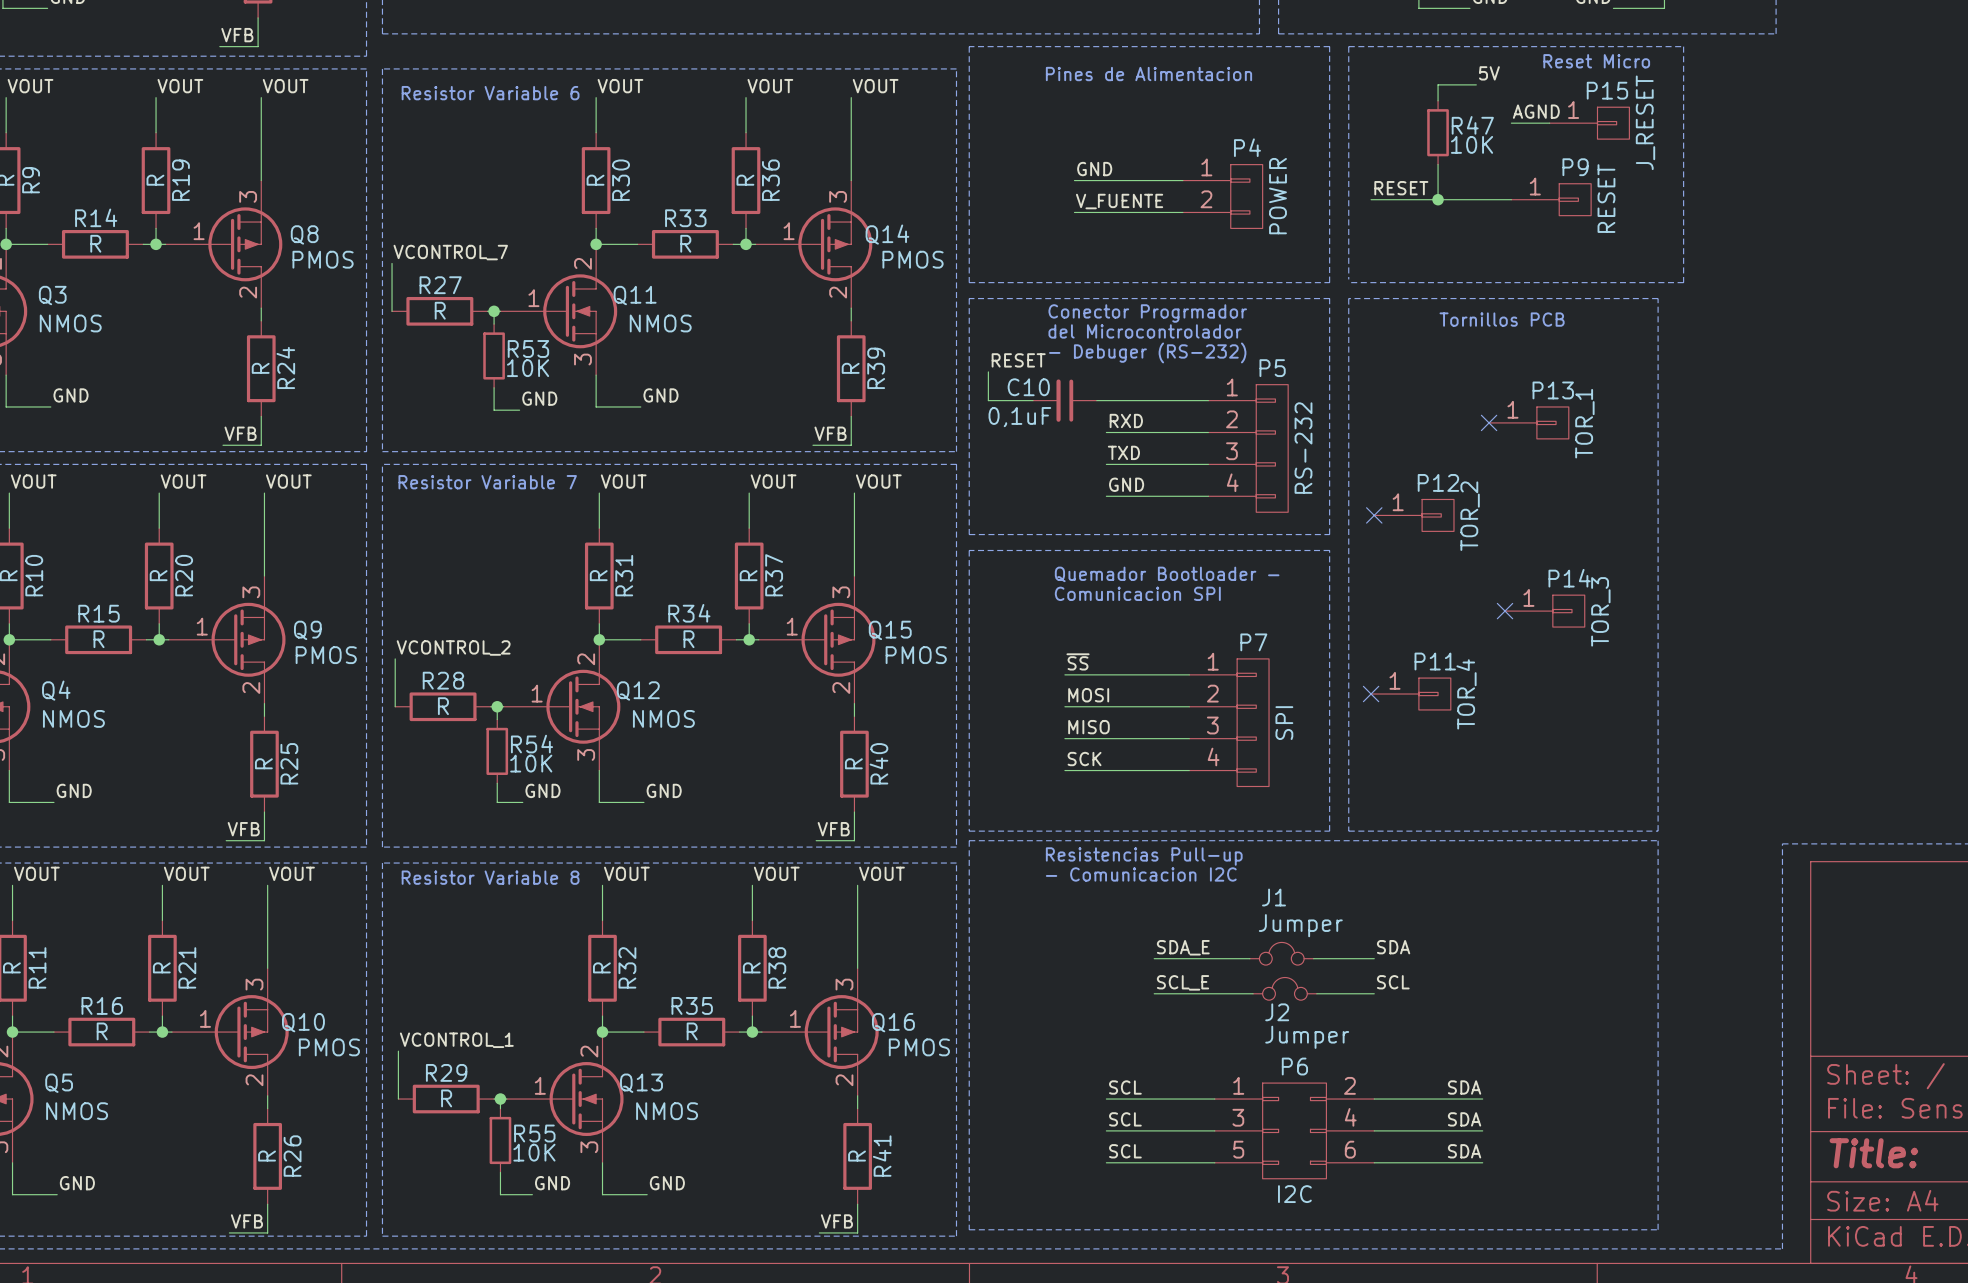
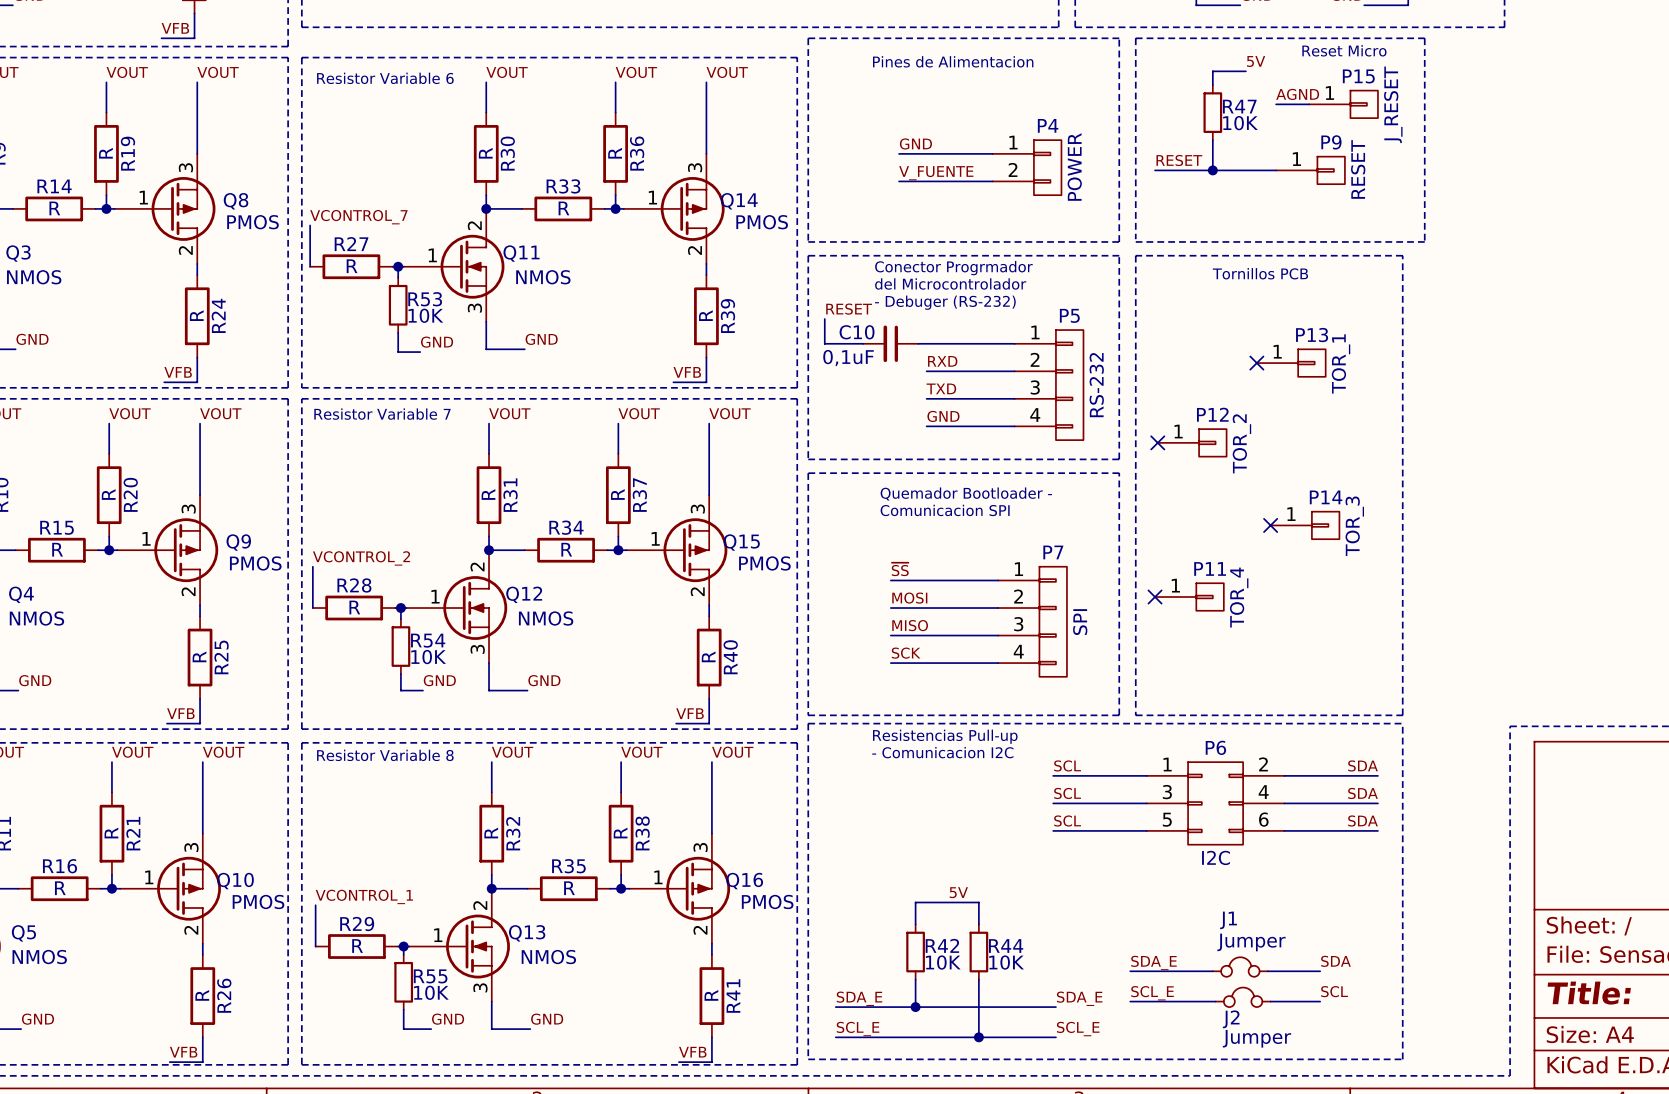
label: none -> SCL (1067, 765)
label: none -> SDA (1363, 765)
label: none -> SCL (1067, 793)
label: none -> SDA (1363, 793)
label: SDA_E (1183, 947) -> none
label: SDA (1393, 947) -> none
label: none -> SCL (1067, 821)
J1 position: (1281, 953) -> (1240, 967)
label: none -> SDA (1363, 821)
wire: (1154, 958) (1249, 958) -> (1130, 971) (1212, 971)
wire: (1313, 958) (1374, 958) -> (1267, 971) (1320, 971)
wire: none -> (1284, 830) (1377, 830)
label: SCL_E (1183, 982) -> none
label: SCL (1393, 982) -> none
J2 position: (1284, 988) -> (1243, 997)
wire: (1154, 993) (1253, 993) -> none
wire: (1316, 993) (1374, 993) -> (1270, 1001) (1320, 1001)
label: none -> 5V (958, 892)
wire: none -> (915, 924) (915, 902) (978, 902) (978, 924)
label: SCL (1125, 1087) -> none
label: SDA (1464, 1087) -> none
wire: (1106, 1099) (1214, 1099) -> (1053, 775) (1146, 775)
wire: (1374, 1099) (1482, 1099) -> (1284, 775) (1377, 775)
R42: none -> 10K (915, 952)
R44: none -> 10K (978, 952)
label: none -> SDA_E (1153, 962)
label: none -> SDA (1335, 961)
label: SCL (1125, 1119) -> none
label: SDA (1464, 1119) -> none
wire: (1106, 1130) (1214, 1130) -> (1053, 803) (1146, 803)
P6 position: (1294, 1130) -> (1215, 803)
wire: (1374, 1130) (1482, 1130) -> (1284, 803) (1377, 803)
wire: none -> (915, 979) (915, 1007)
wire: none -> (978, 979) (978, 1037)
label: SCL (1125, 1151) -> none
label: none -> SCL_E (1152, 993)
label: SDA (1464, 1151) -> none
label: none -> SCL (1334, 991)
label: none -> SDA_E (859, 998)
label: none -> SDA_E (1079, 998)
wire: (1106, 1162) (1214, 1162) -> (1053, 830) (1146, 830)
wire: (1441, 1162) (1482, 1162) -> none
wire: none -> (835, 1007) (1055, 1007)
junction: none -> (915, 1007)
label: none -> SCL_E (858, 1029)
label: none -> SCL_E (1078, 1029)
wire: none -> (835, 1037) (1055, 1037)
junction: none -> (978, 1037)

